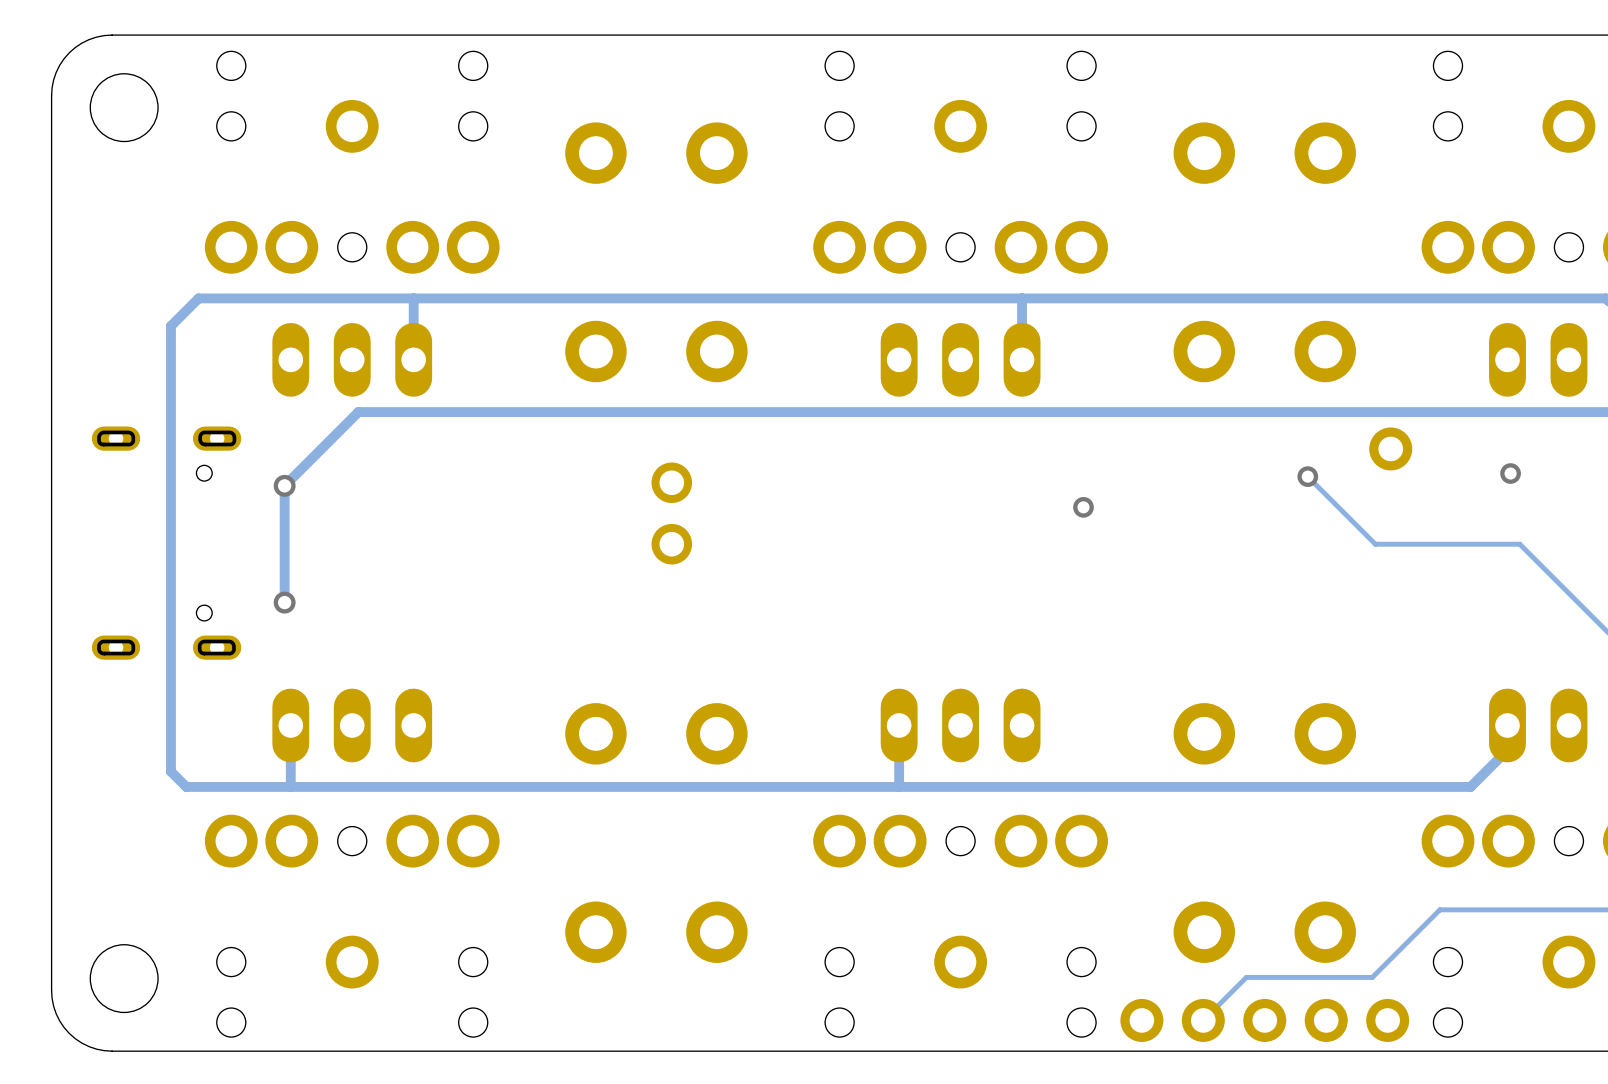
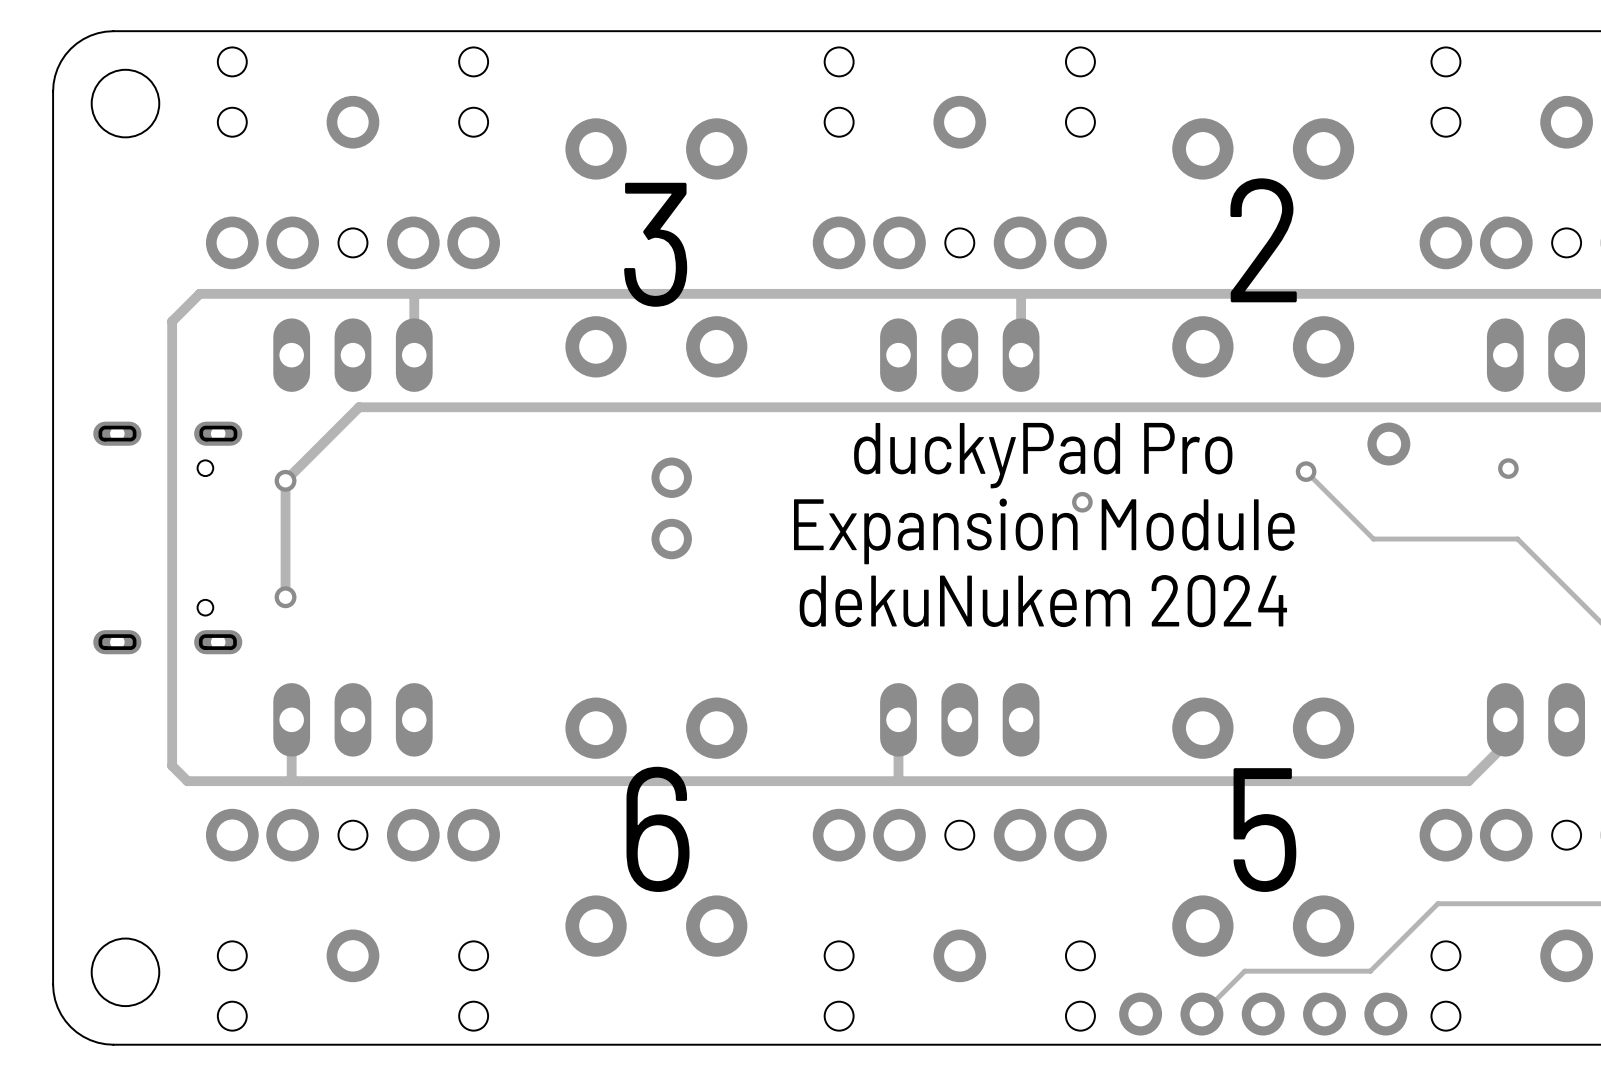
text: none -> 2 (1263, 240)
text: none -> 3 (655, 244)
text: none -> duckyPad Pro (1043, 455)
text: none -> Expansion Module (1044, 531)
text: none -> dekuNukem 2024 (1043, 601)
text: none -> 6 (658, 829)
text: none -> 5 (1264, 830)

